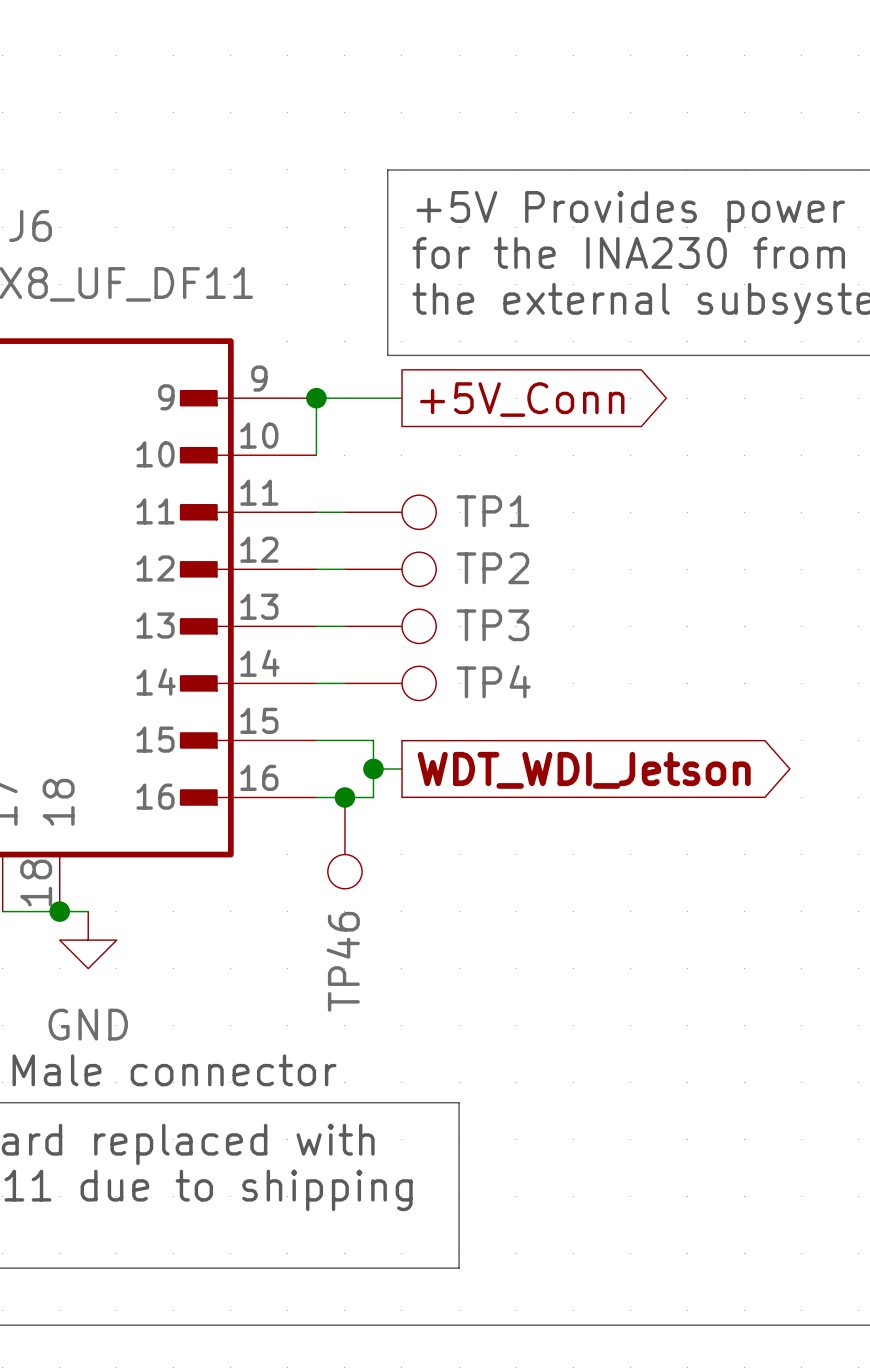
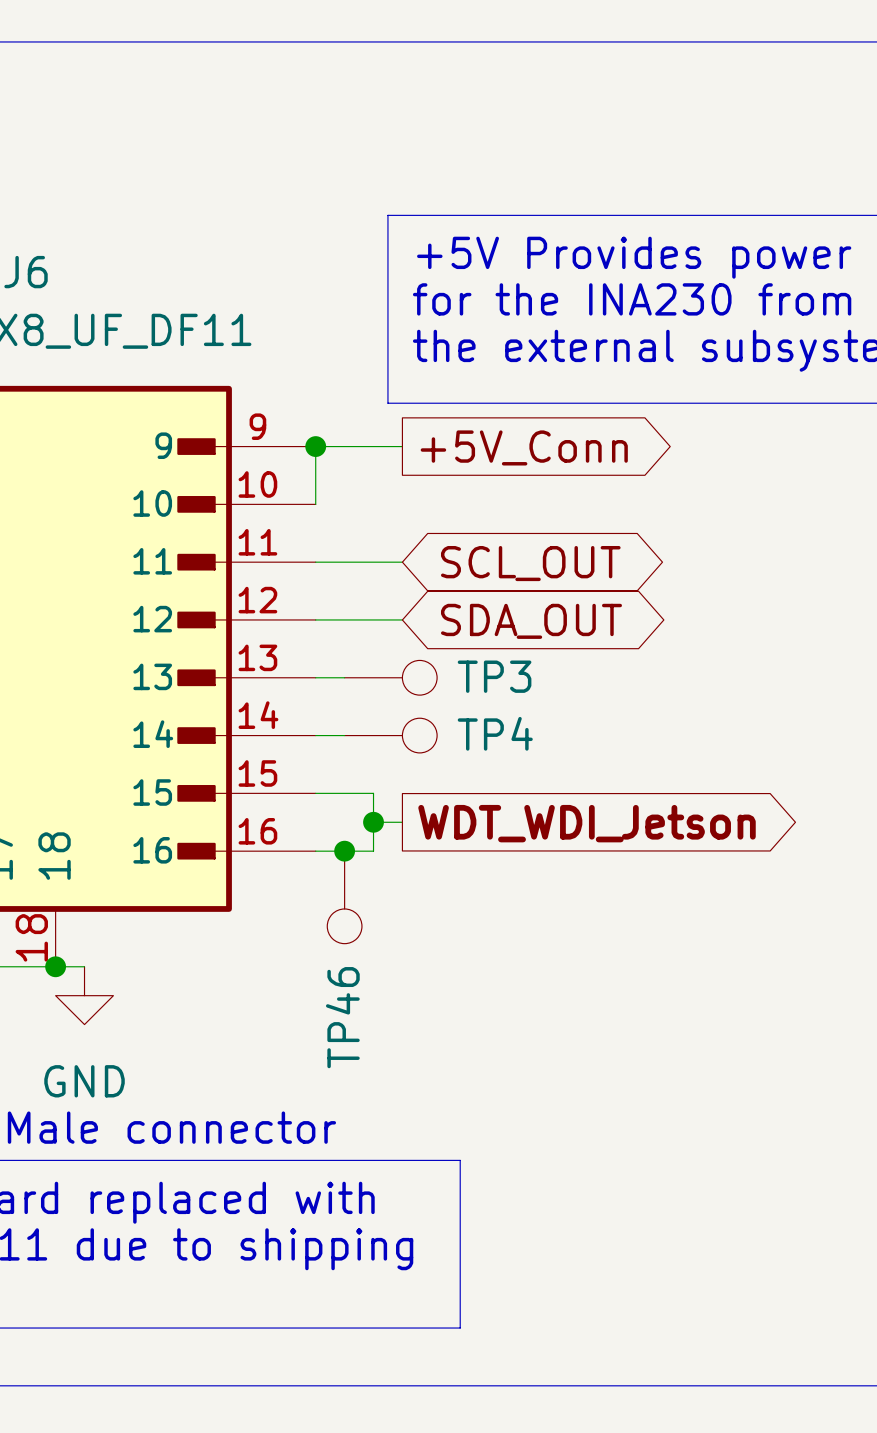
TP1: (390, 512) -> none
global label: none -> SCL_OUT (530, 563)
TP2: (390, 569) -> none
global label: none -> SDA_OUT (531, 621)

